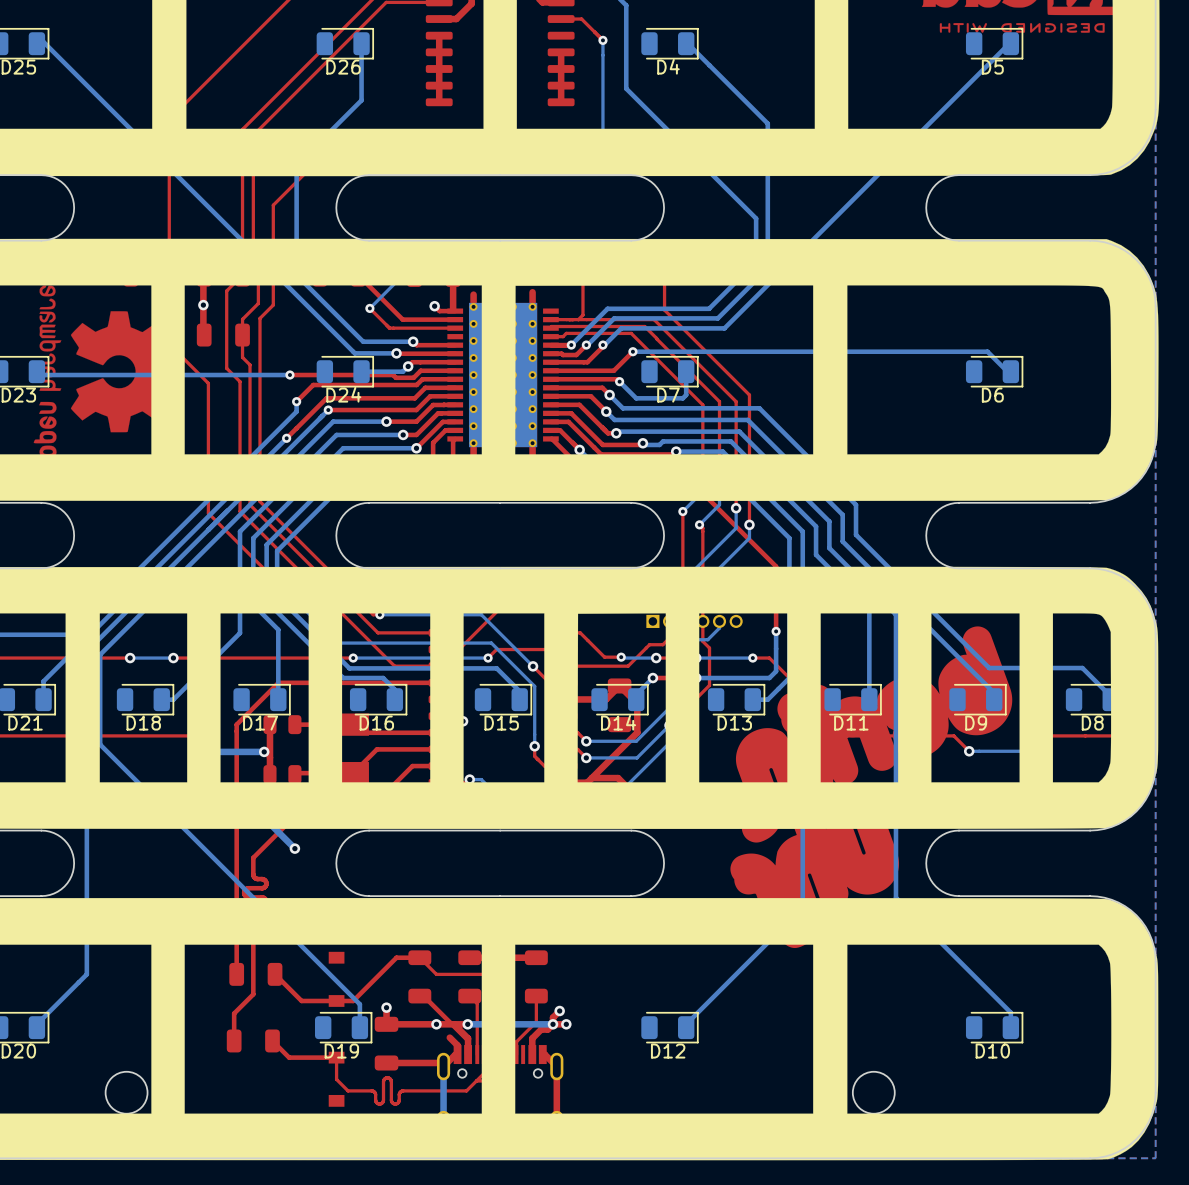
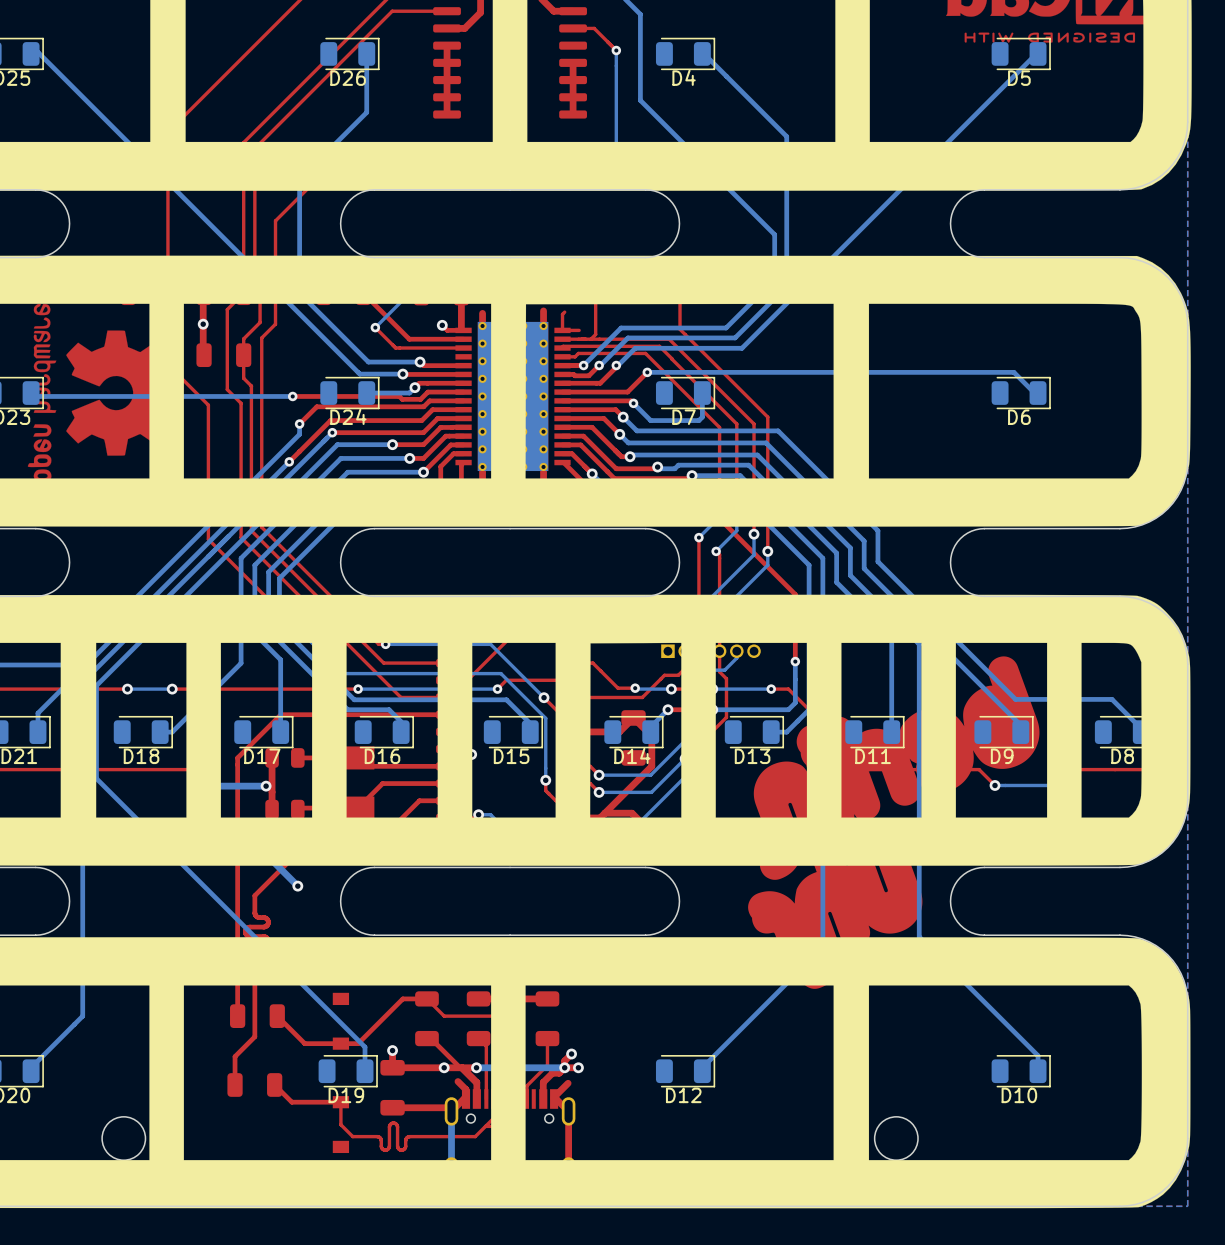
top track: none -> (564, 312) (562, 314) (562, 330) (579, 330)
top track: none -> (568, 1083) (554, 1099)

